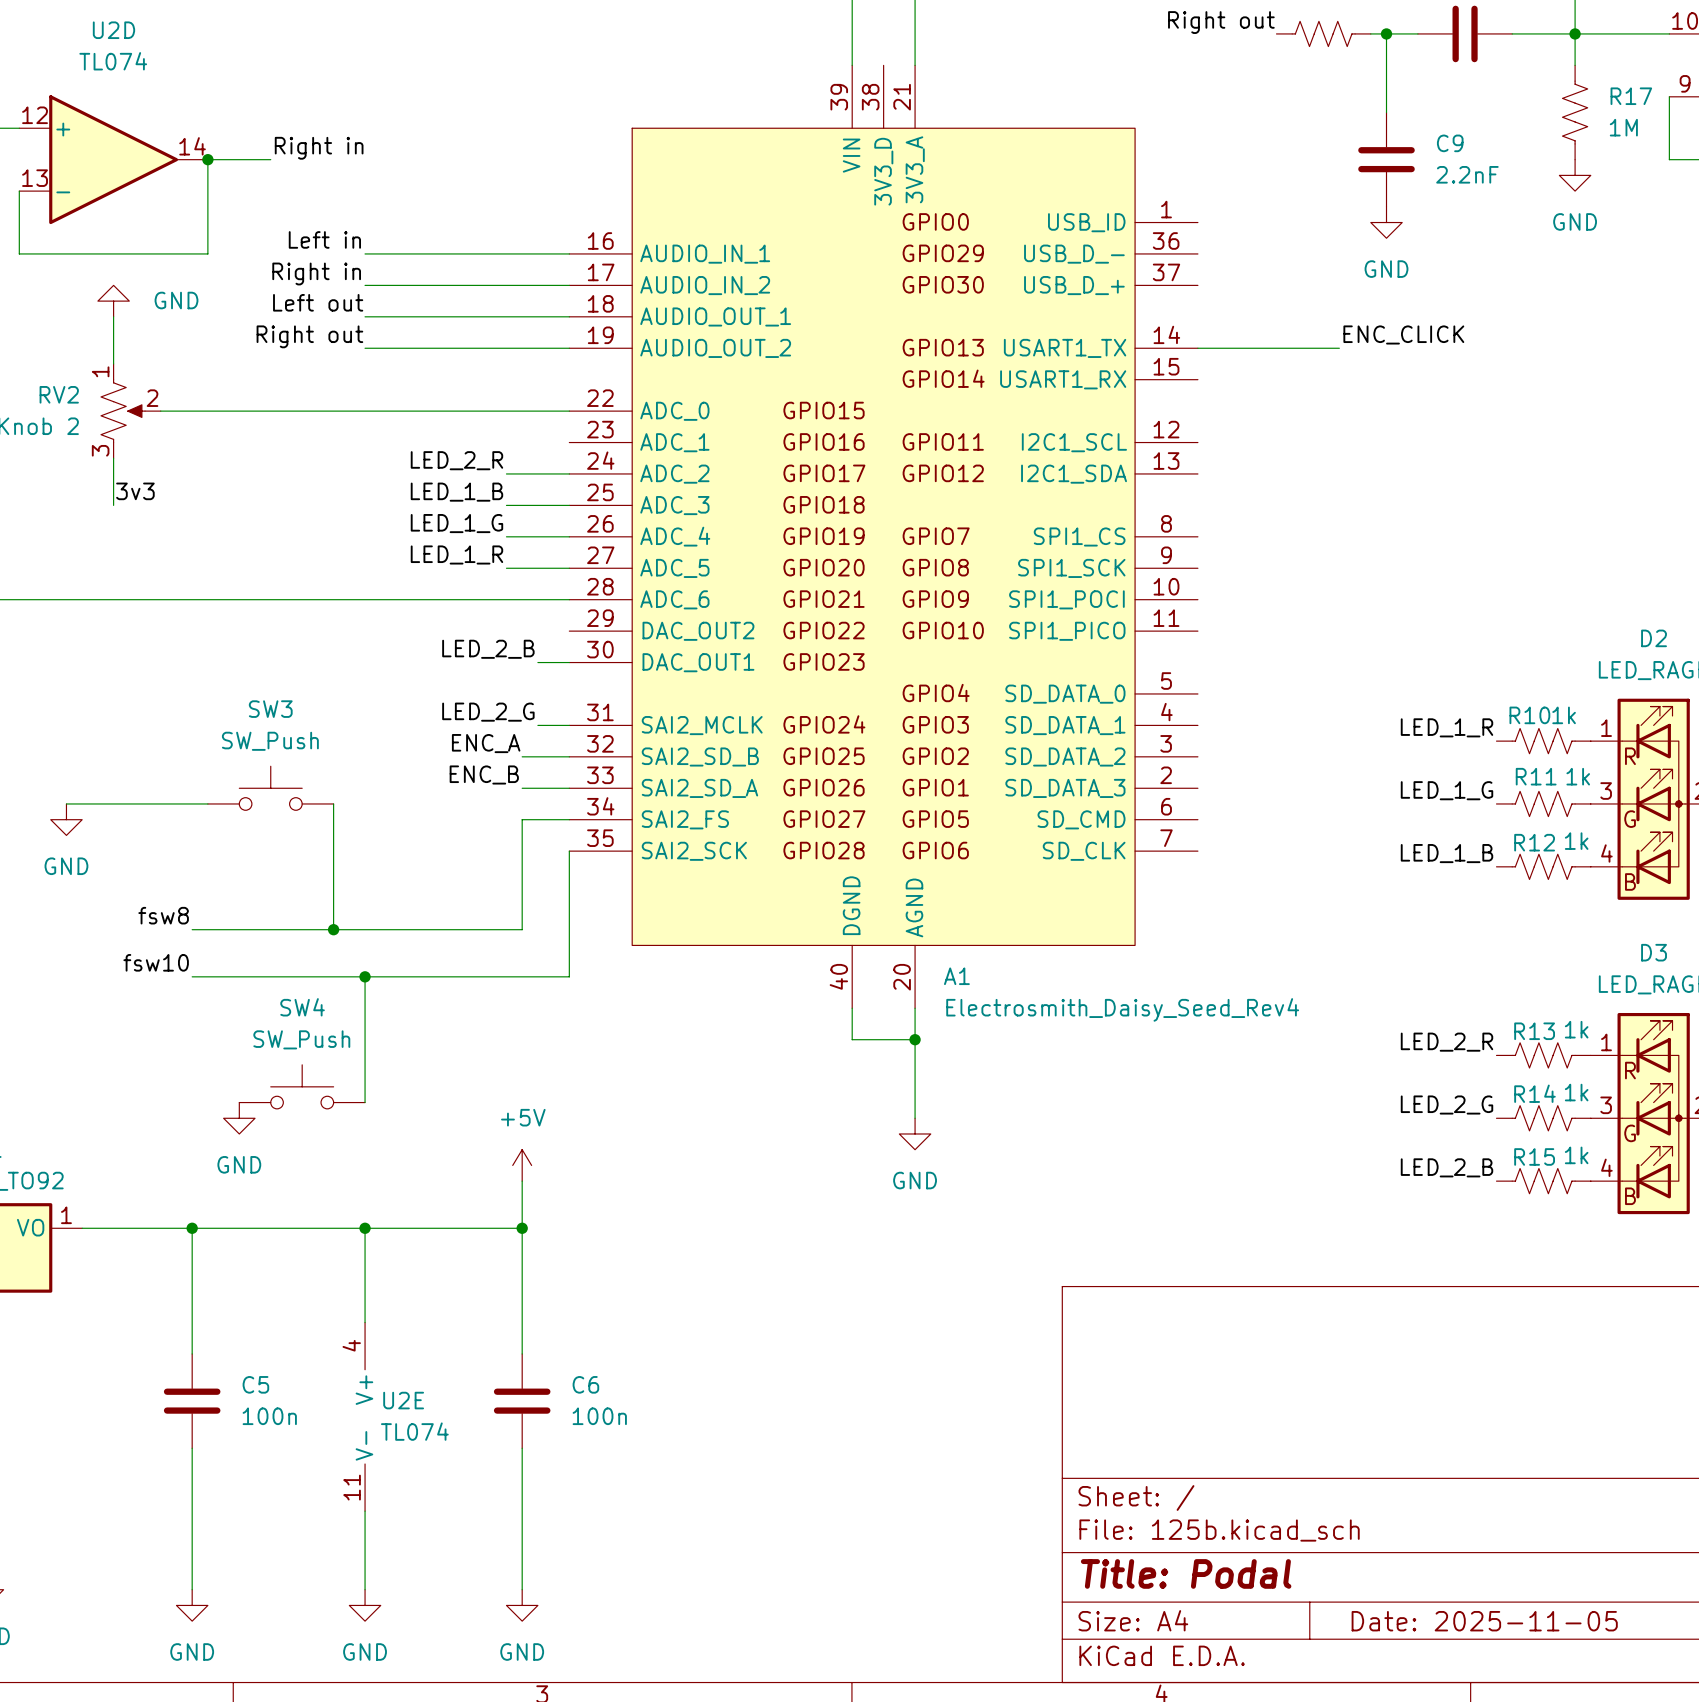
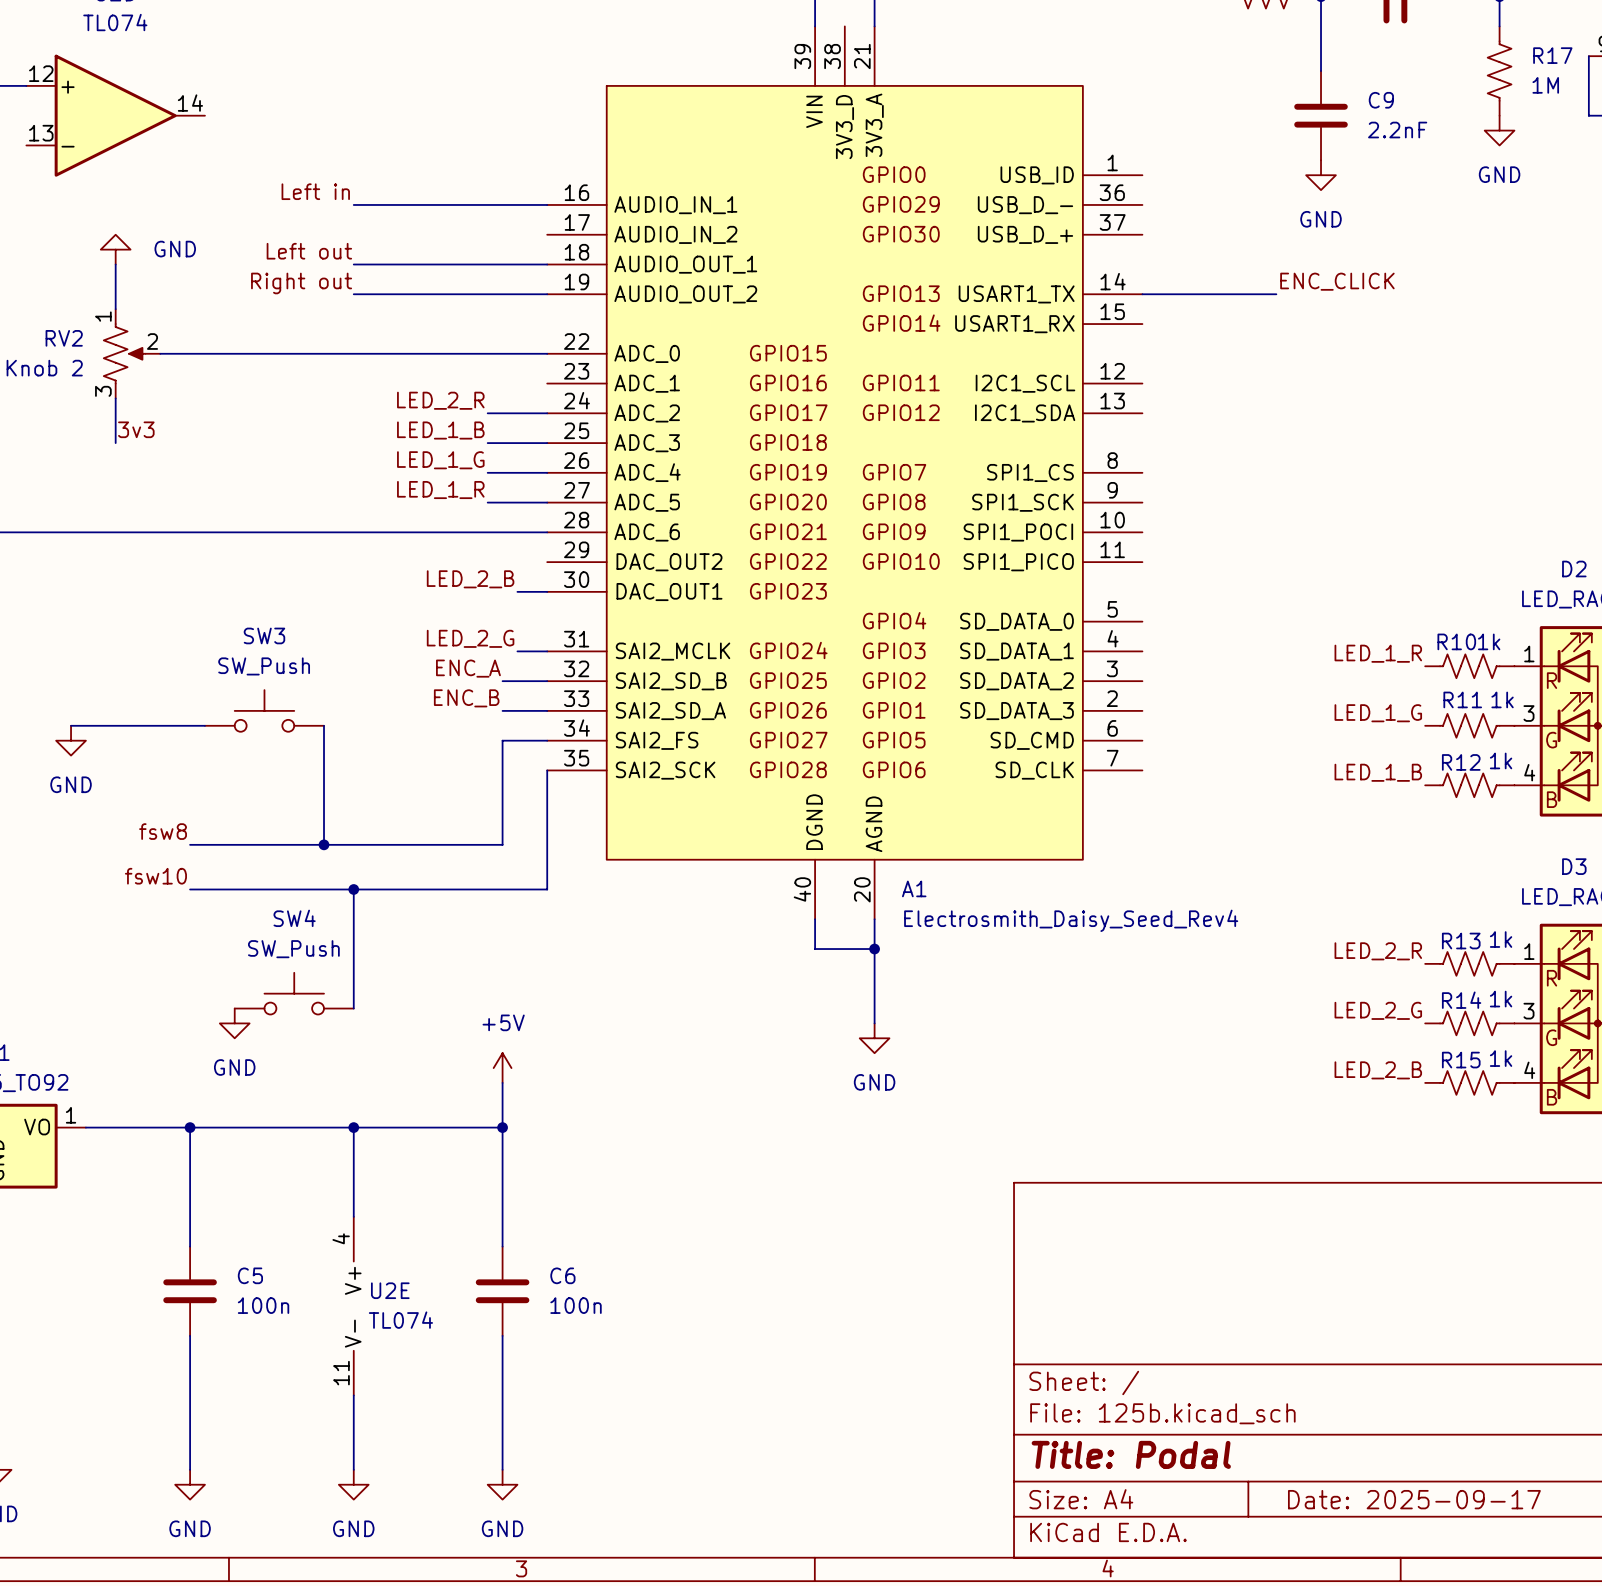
label: Right in (319, 148) -> none
junction: (207, 159) -> none
wire: (270, 159) (207, 159) (207, 253) (19, 253) (19, 191) -> none
label: Right in (316, 273) -> none
wire: (365, 285) (569, 285) -> none
title block: Date: 2025-11-05 (1484, 1621) -> Date: 2025-09-17 (1414, 1499)

